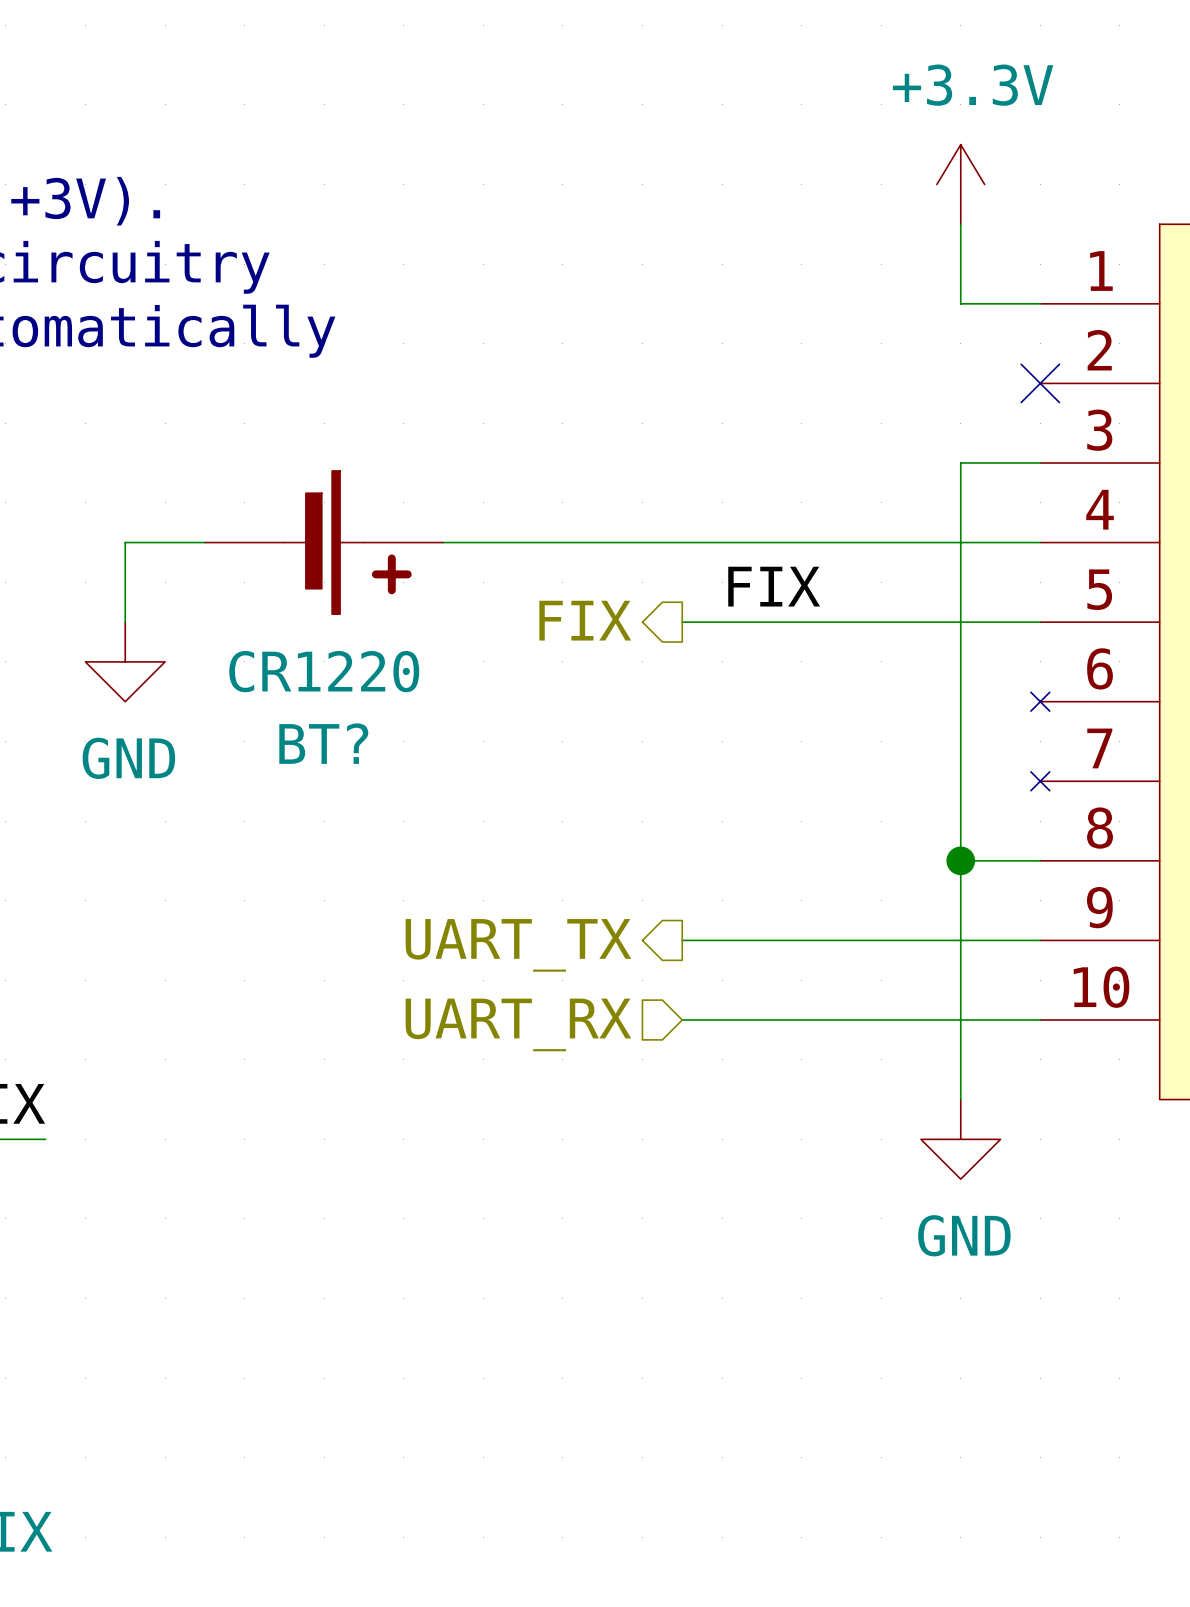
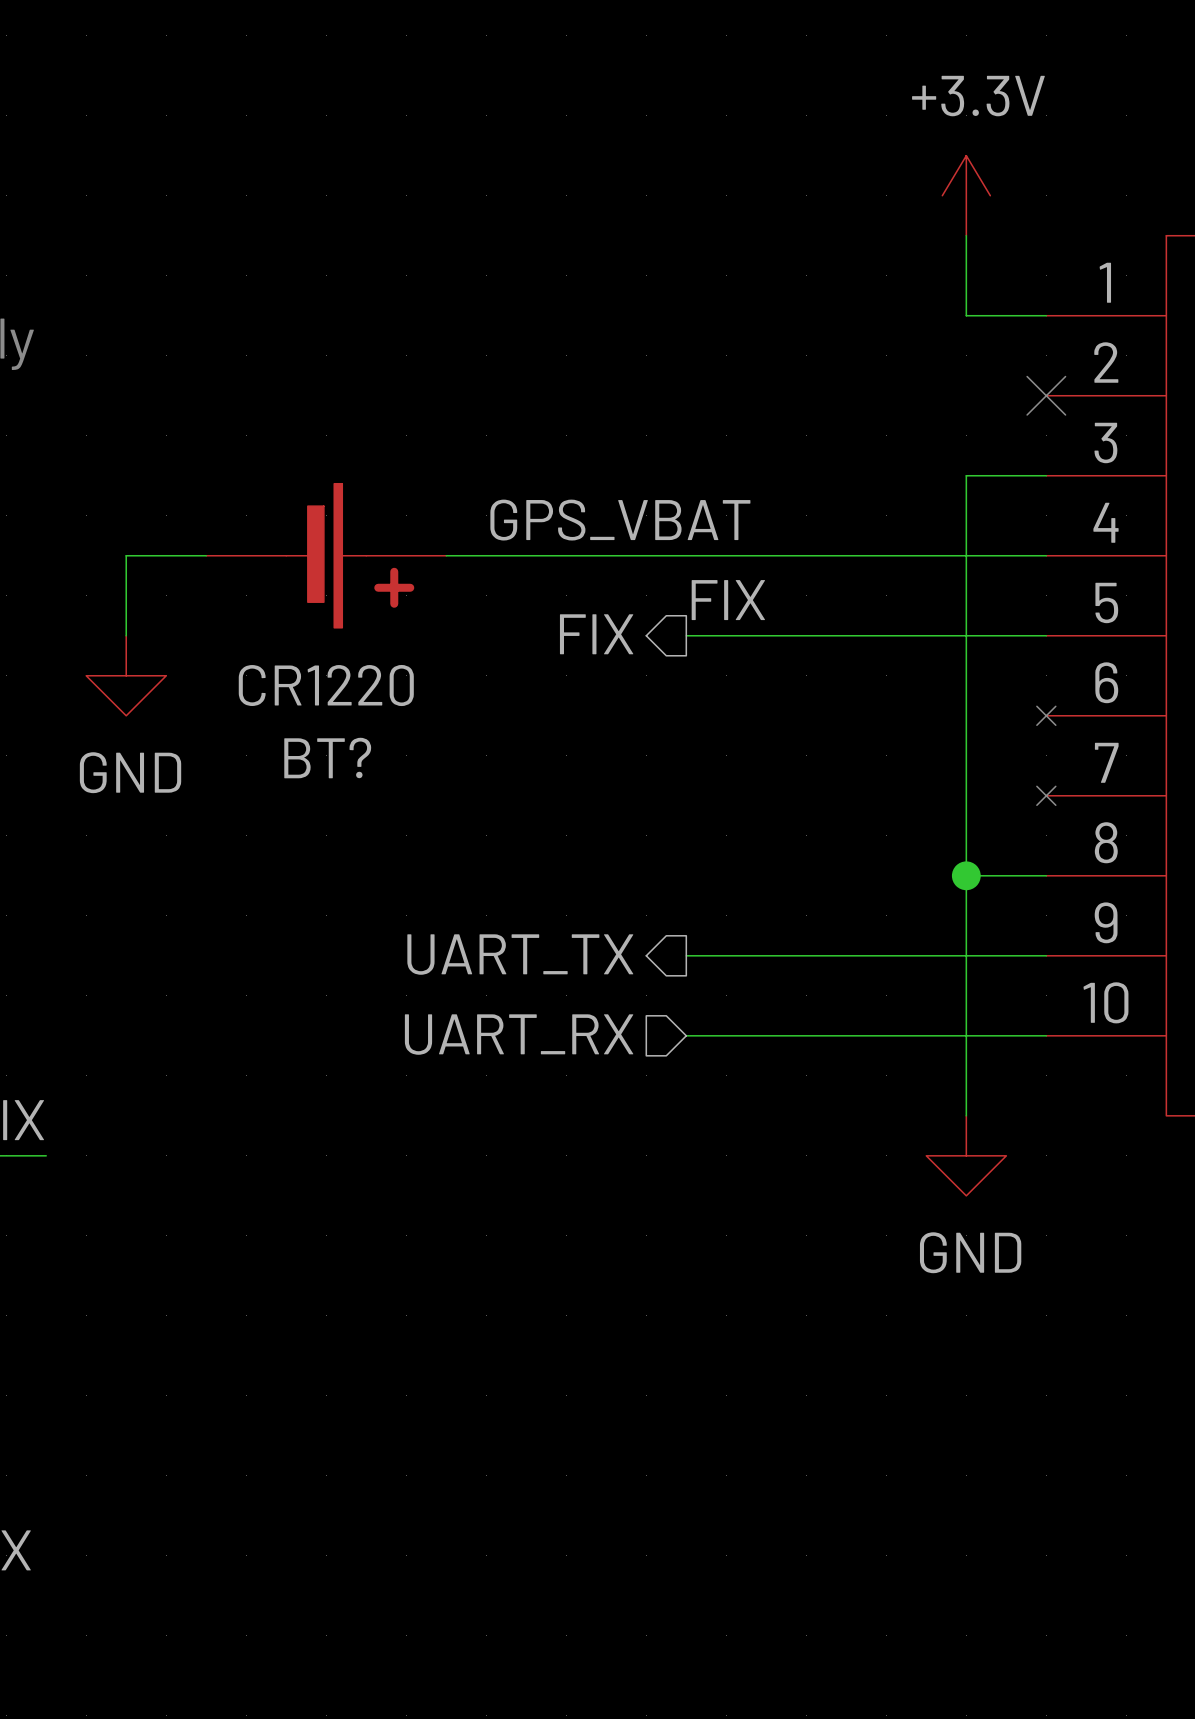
label: none -> GPS_VBAT (620, 520)
label position: FIX (774, 586) -> FIX (728, 600)

